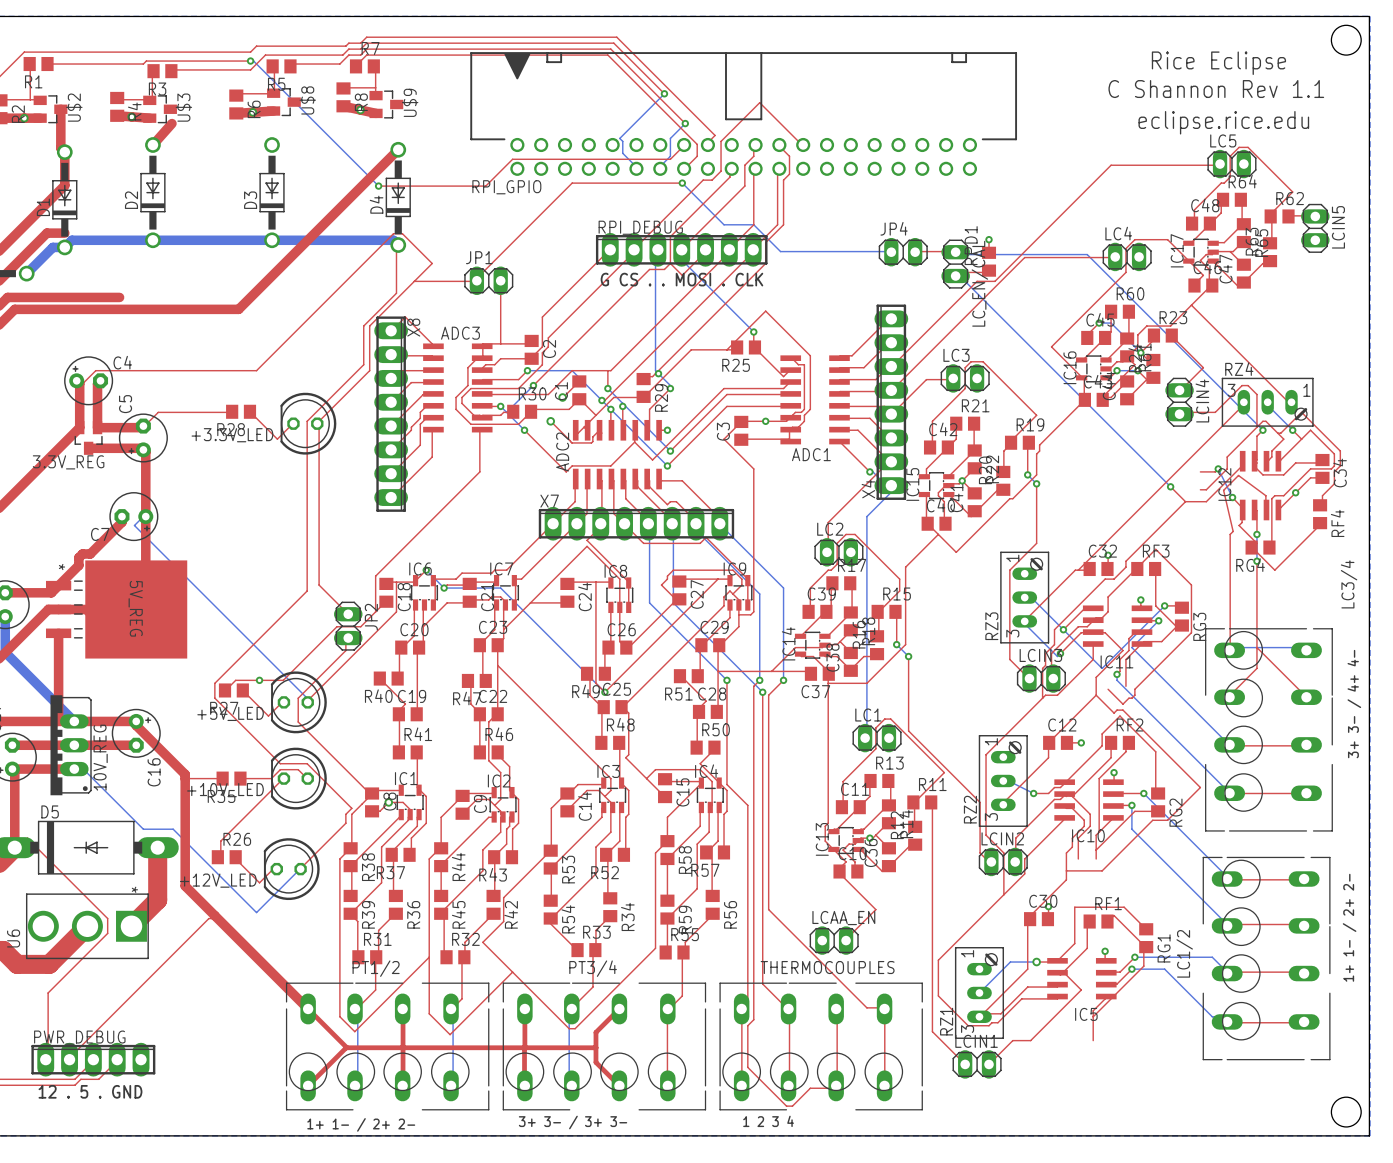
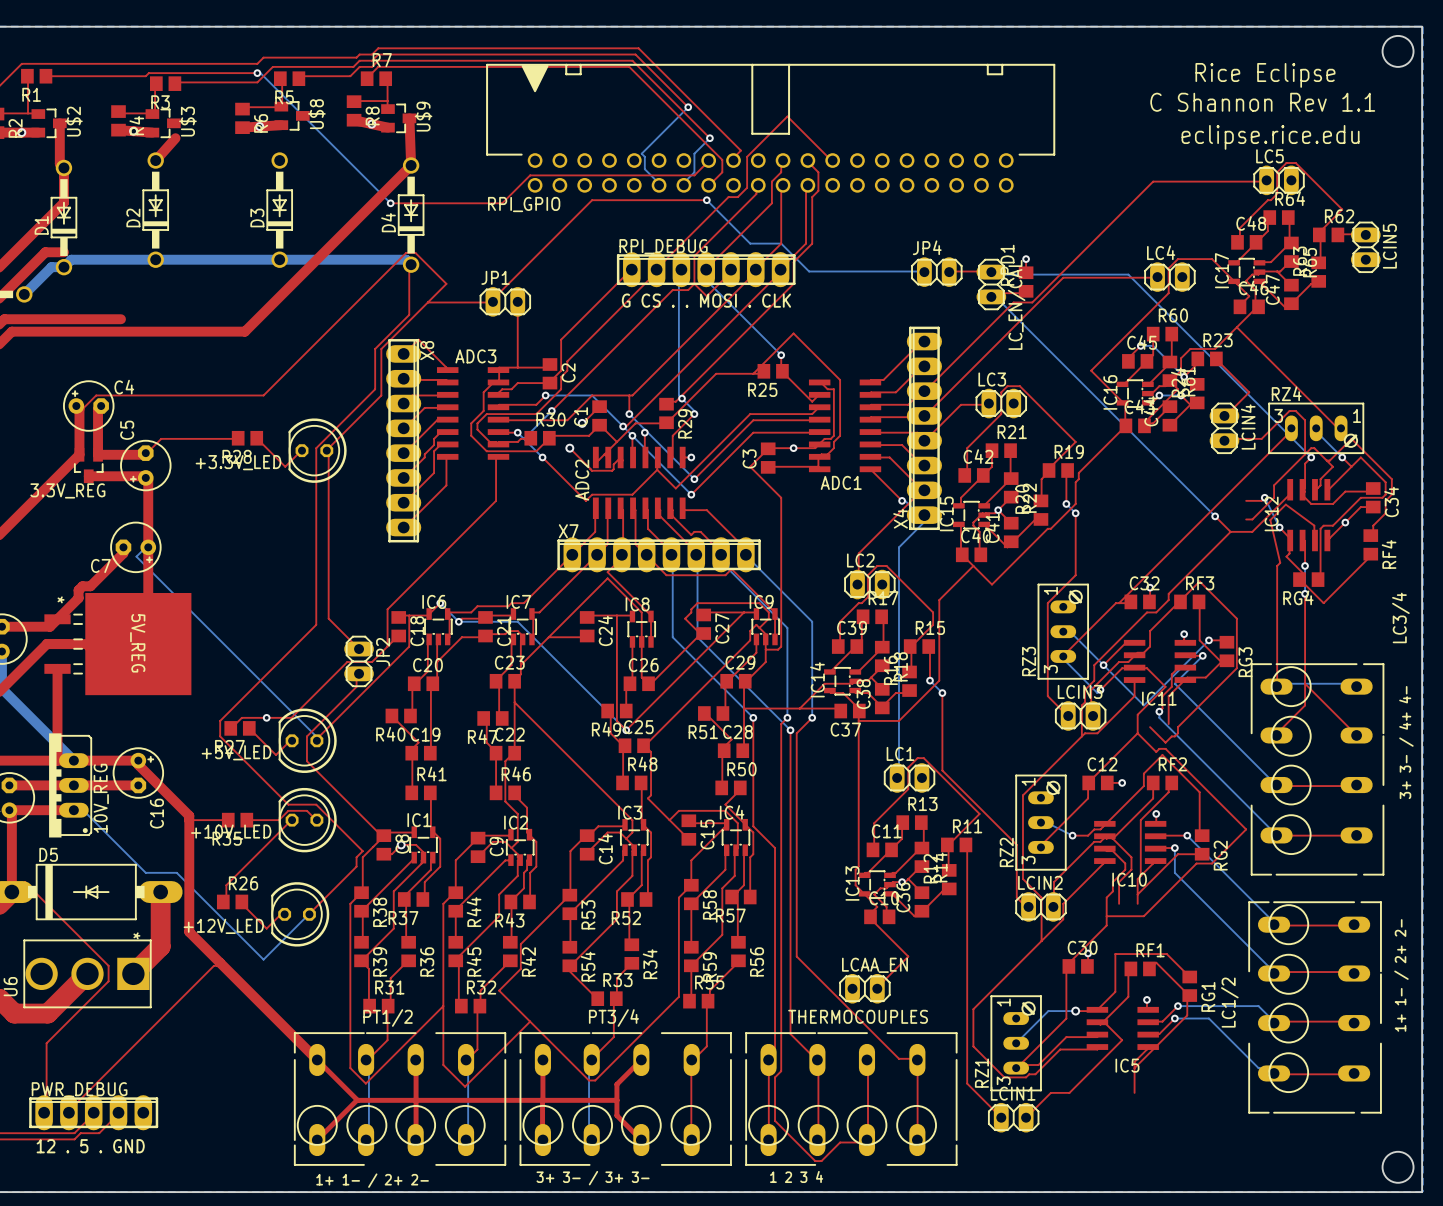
top track: none -> (409, 118) (411, 165)

